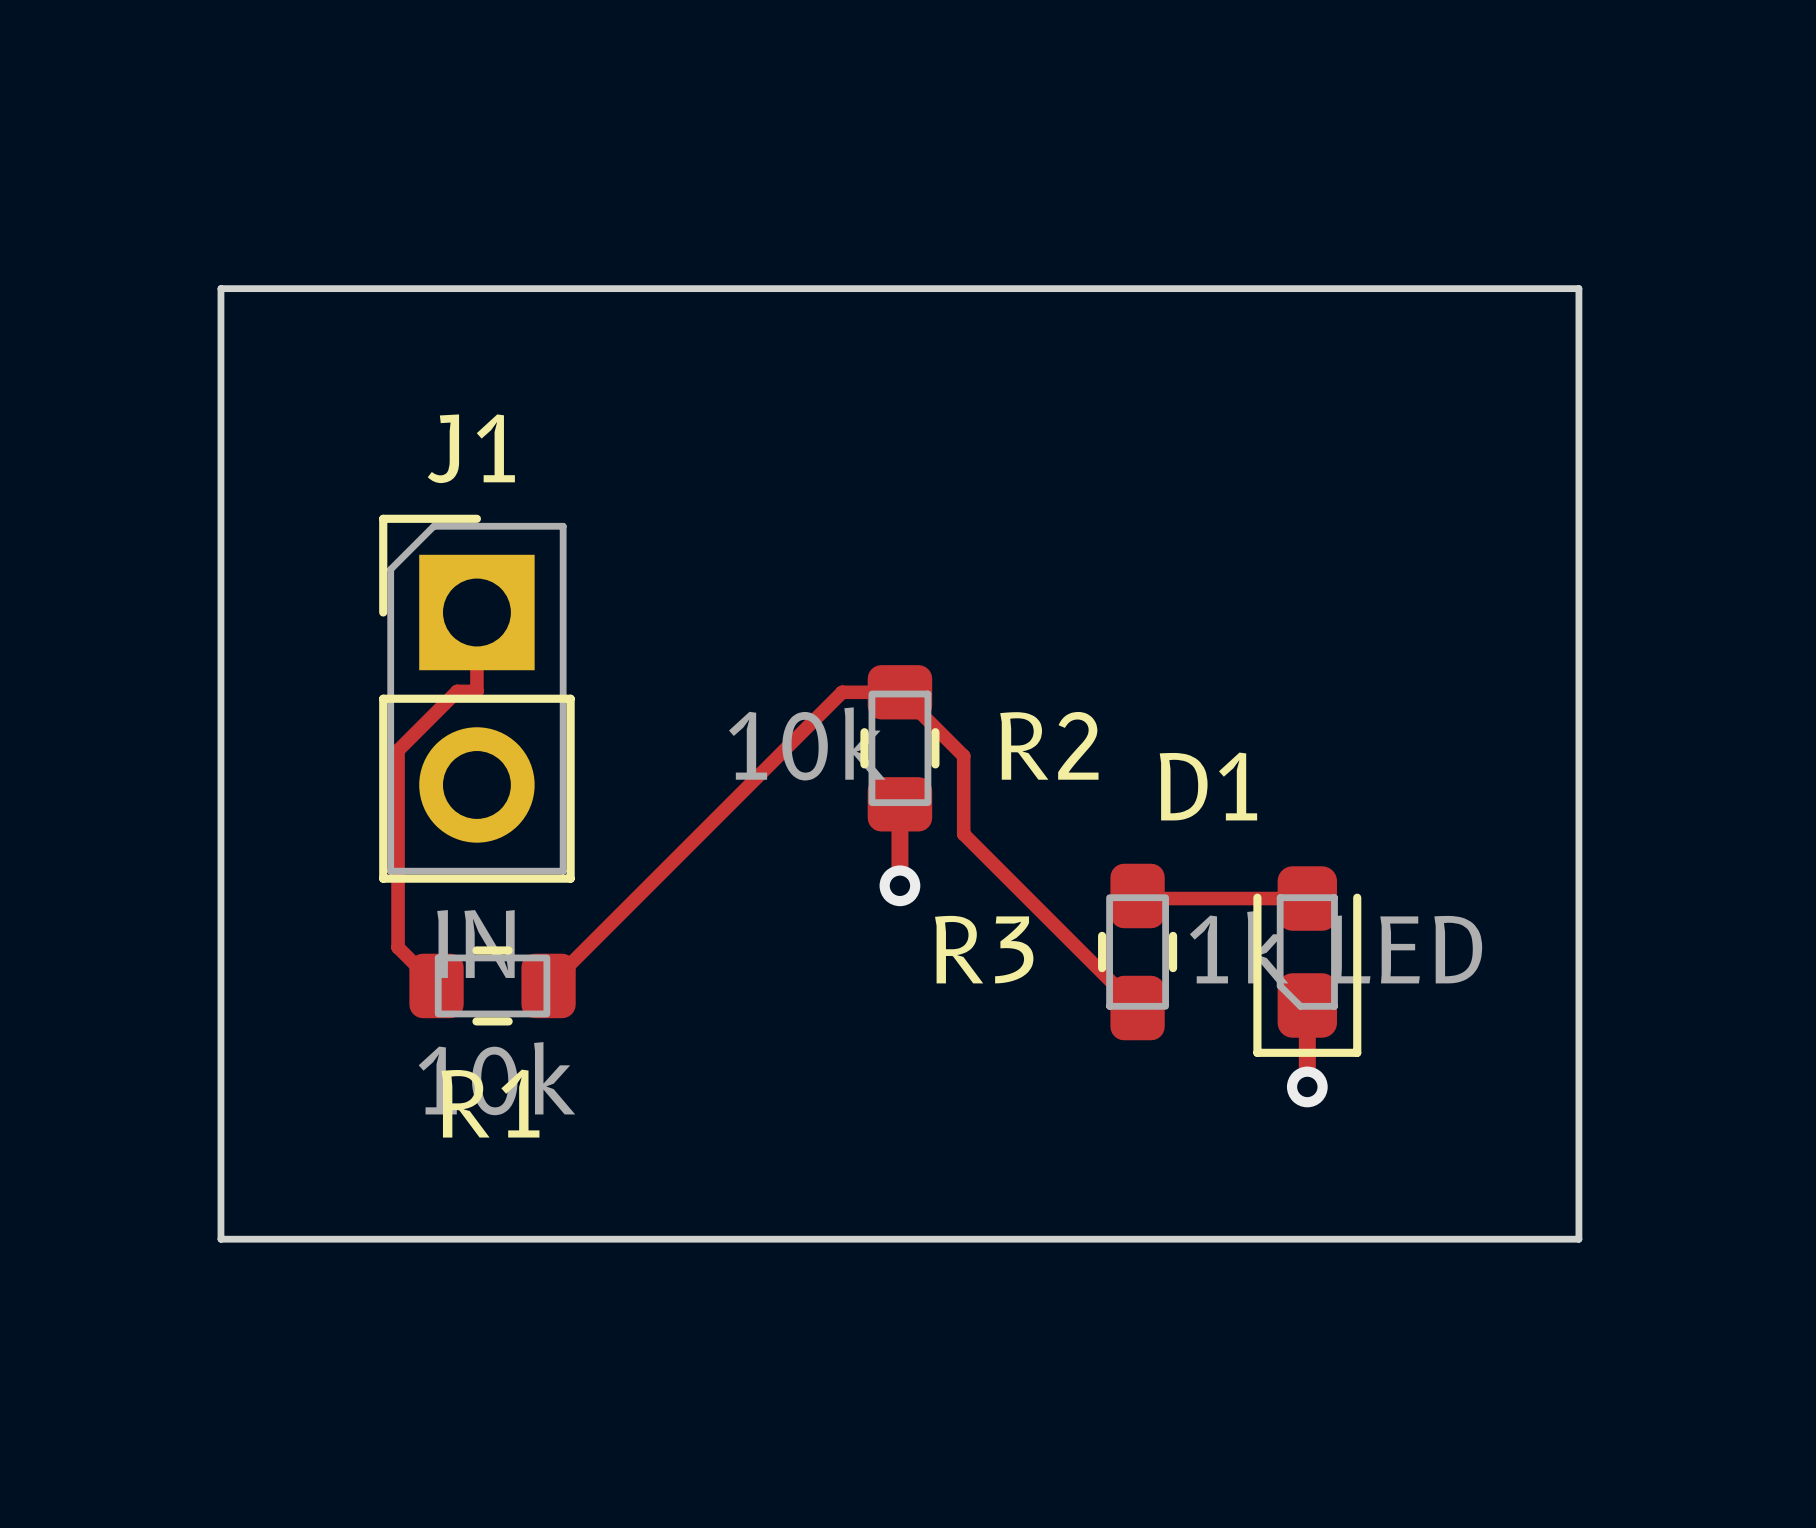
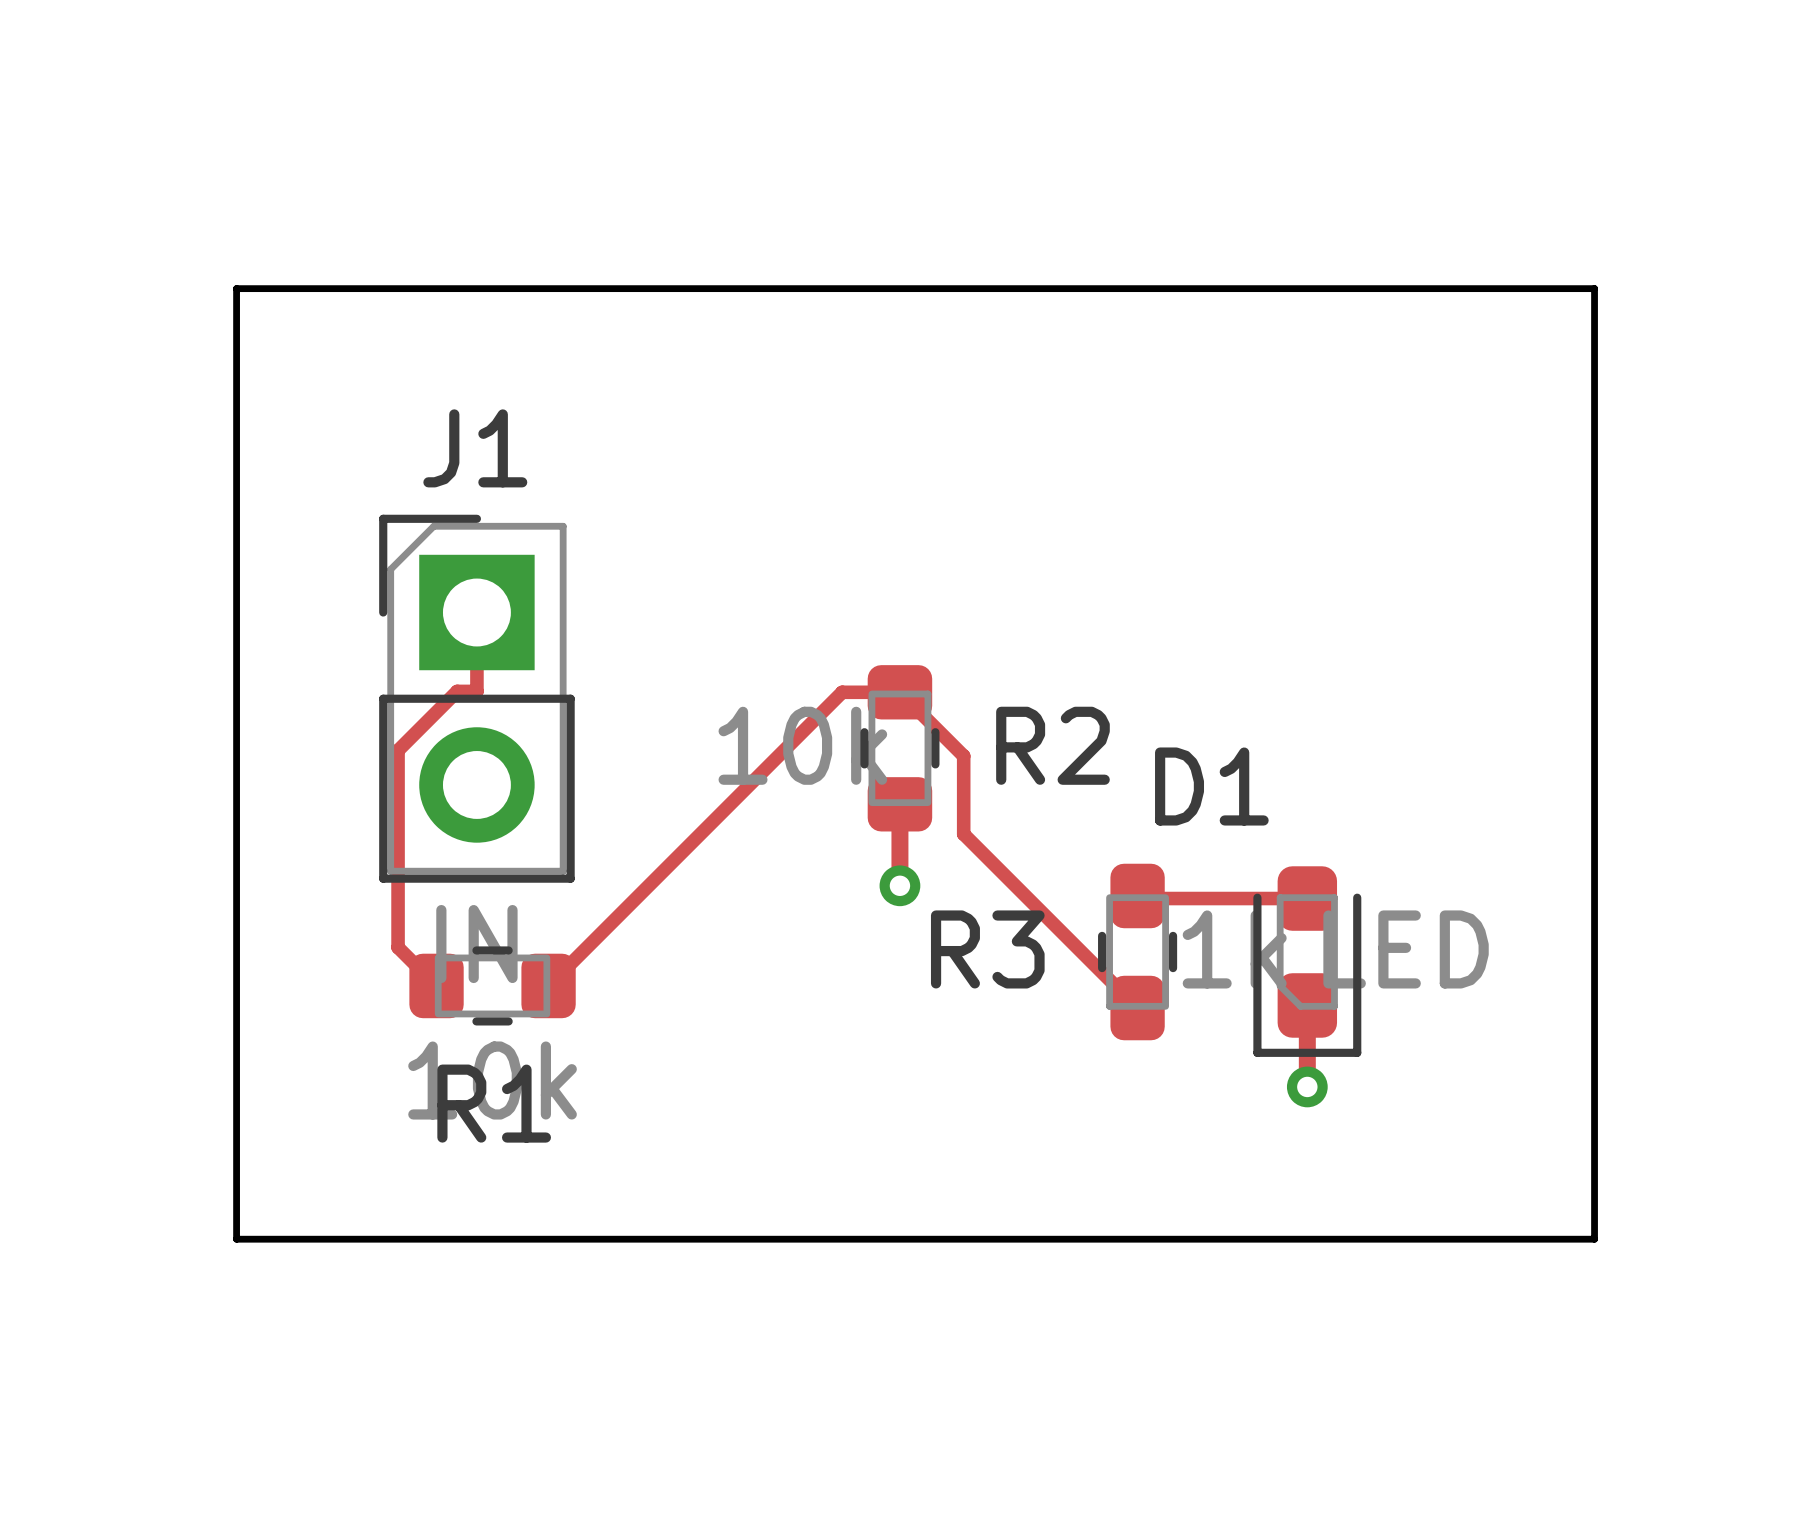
board edge: (236, 288) (220, 288) (220, 1239) (236, 1239) -> (236, 288) (236, 1239)
board edge: (1578, 288) (1578, 1239) -> (1578, 288) (1594, 288) (1594, 1239) (1578, 1239)

